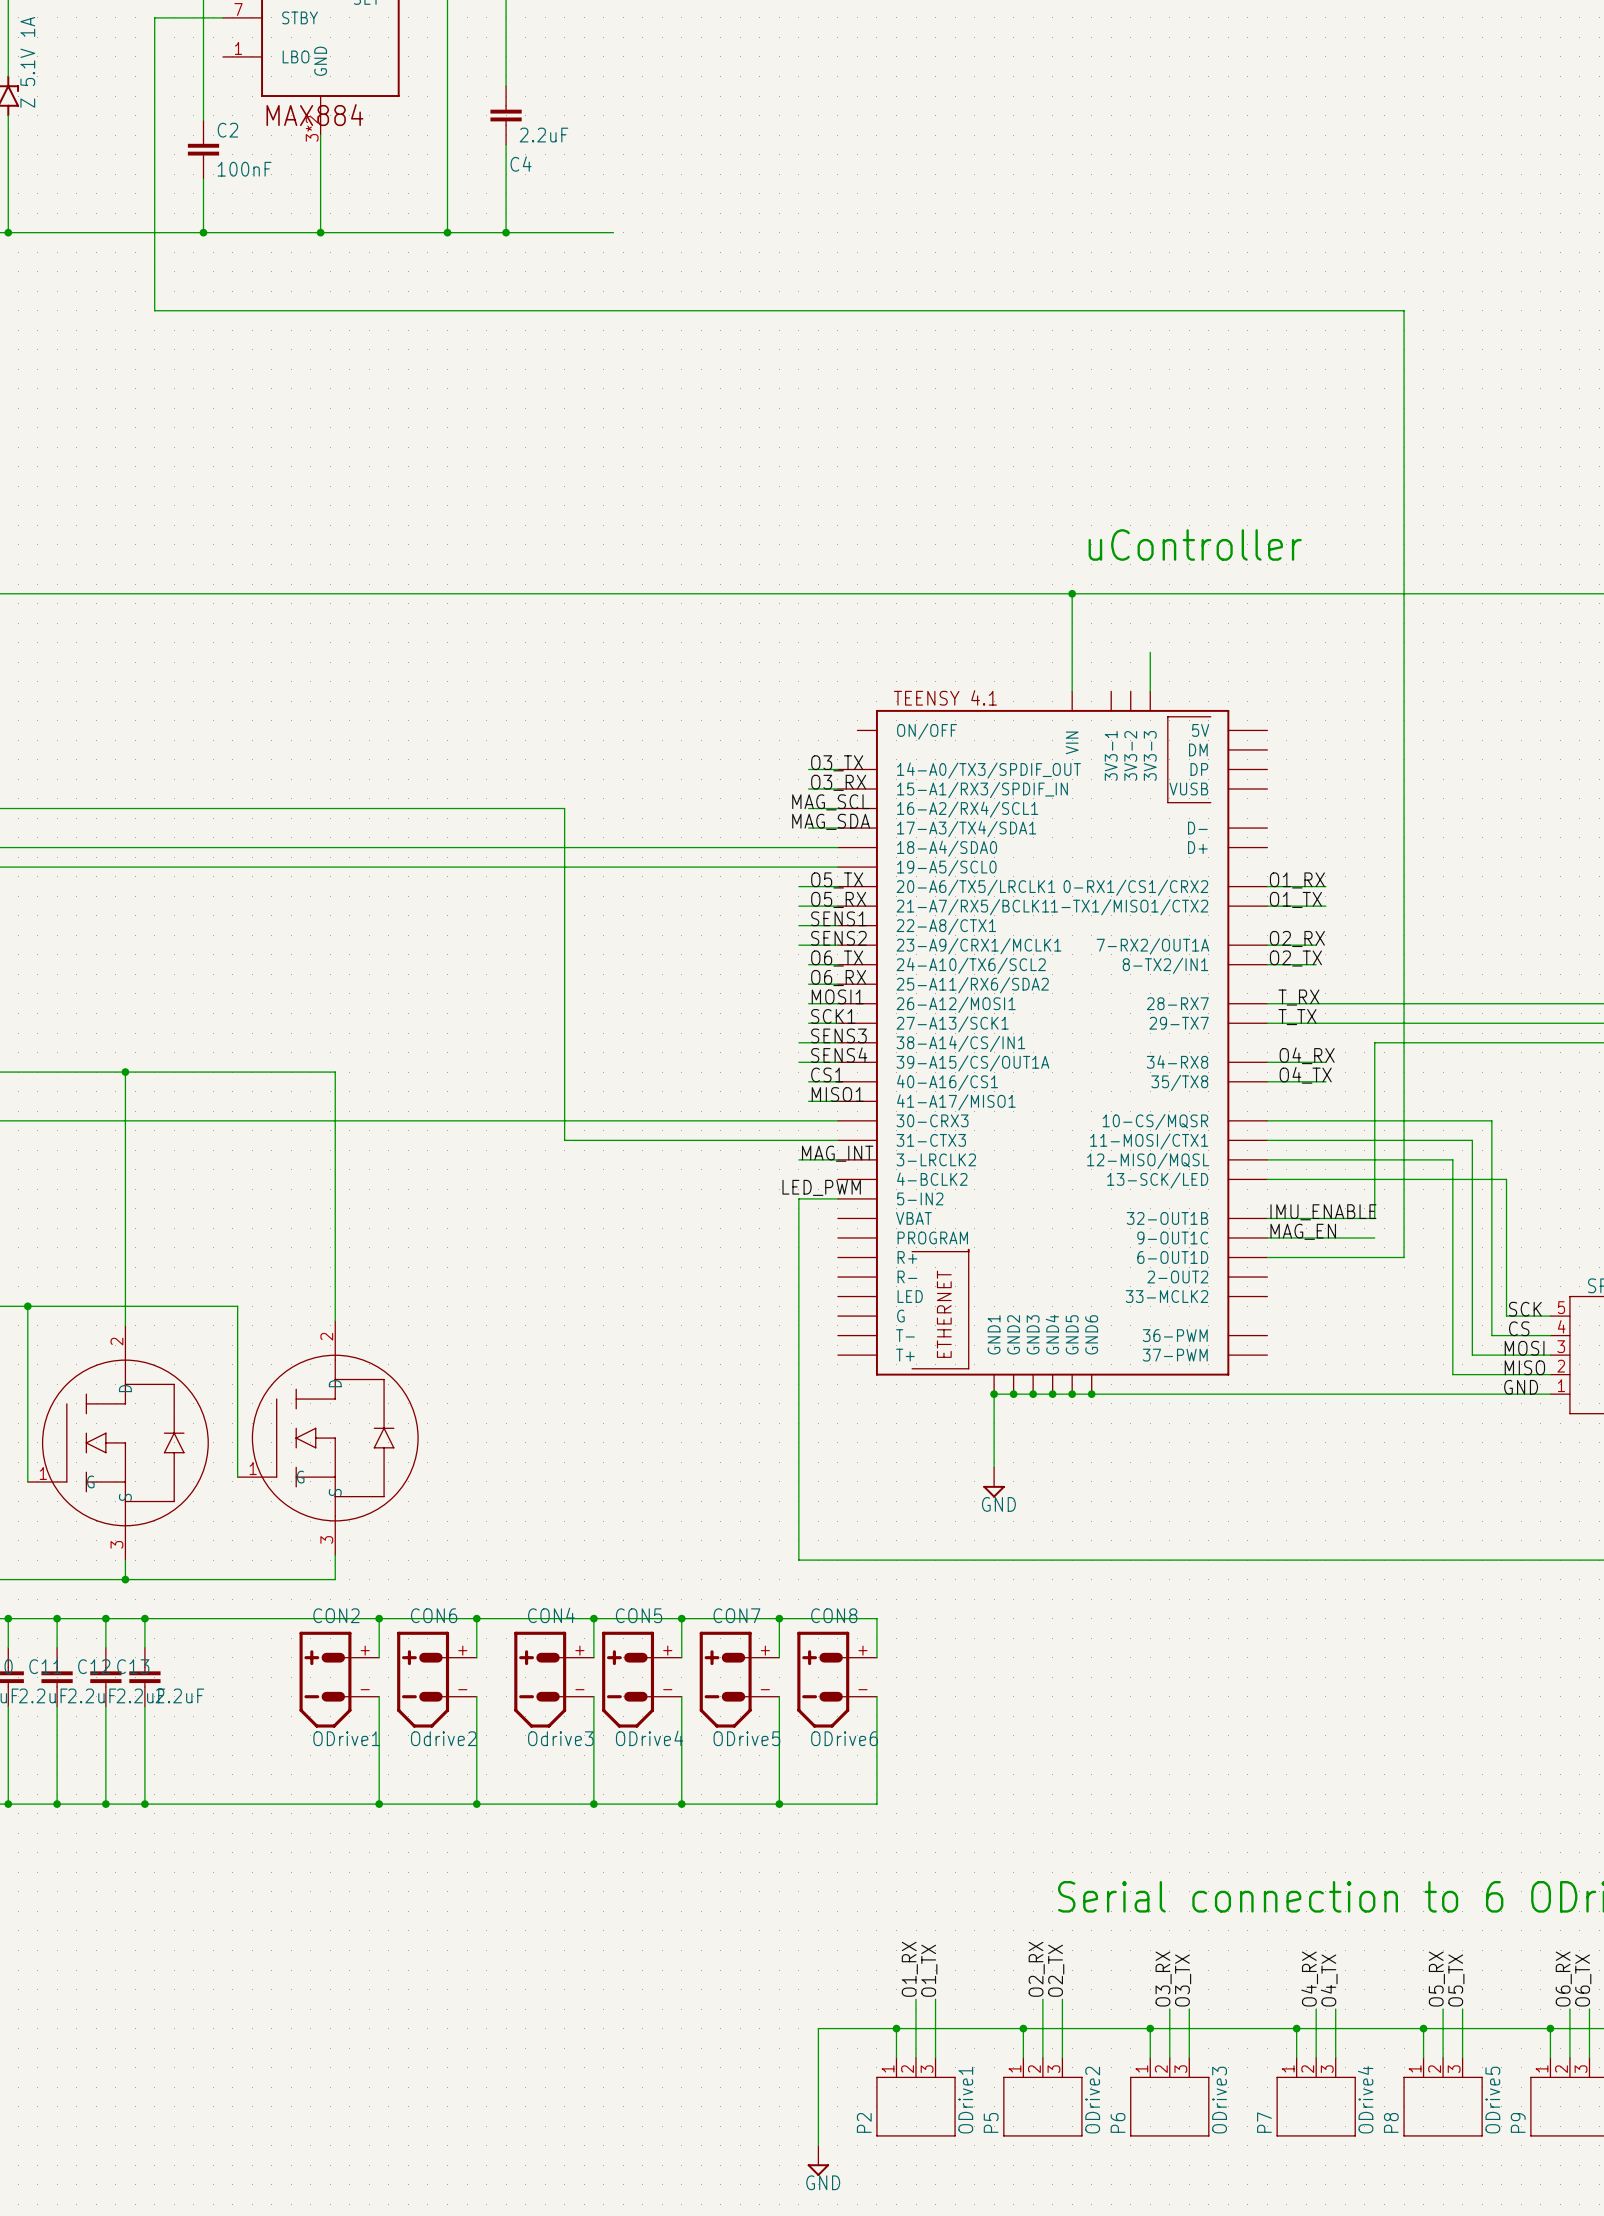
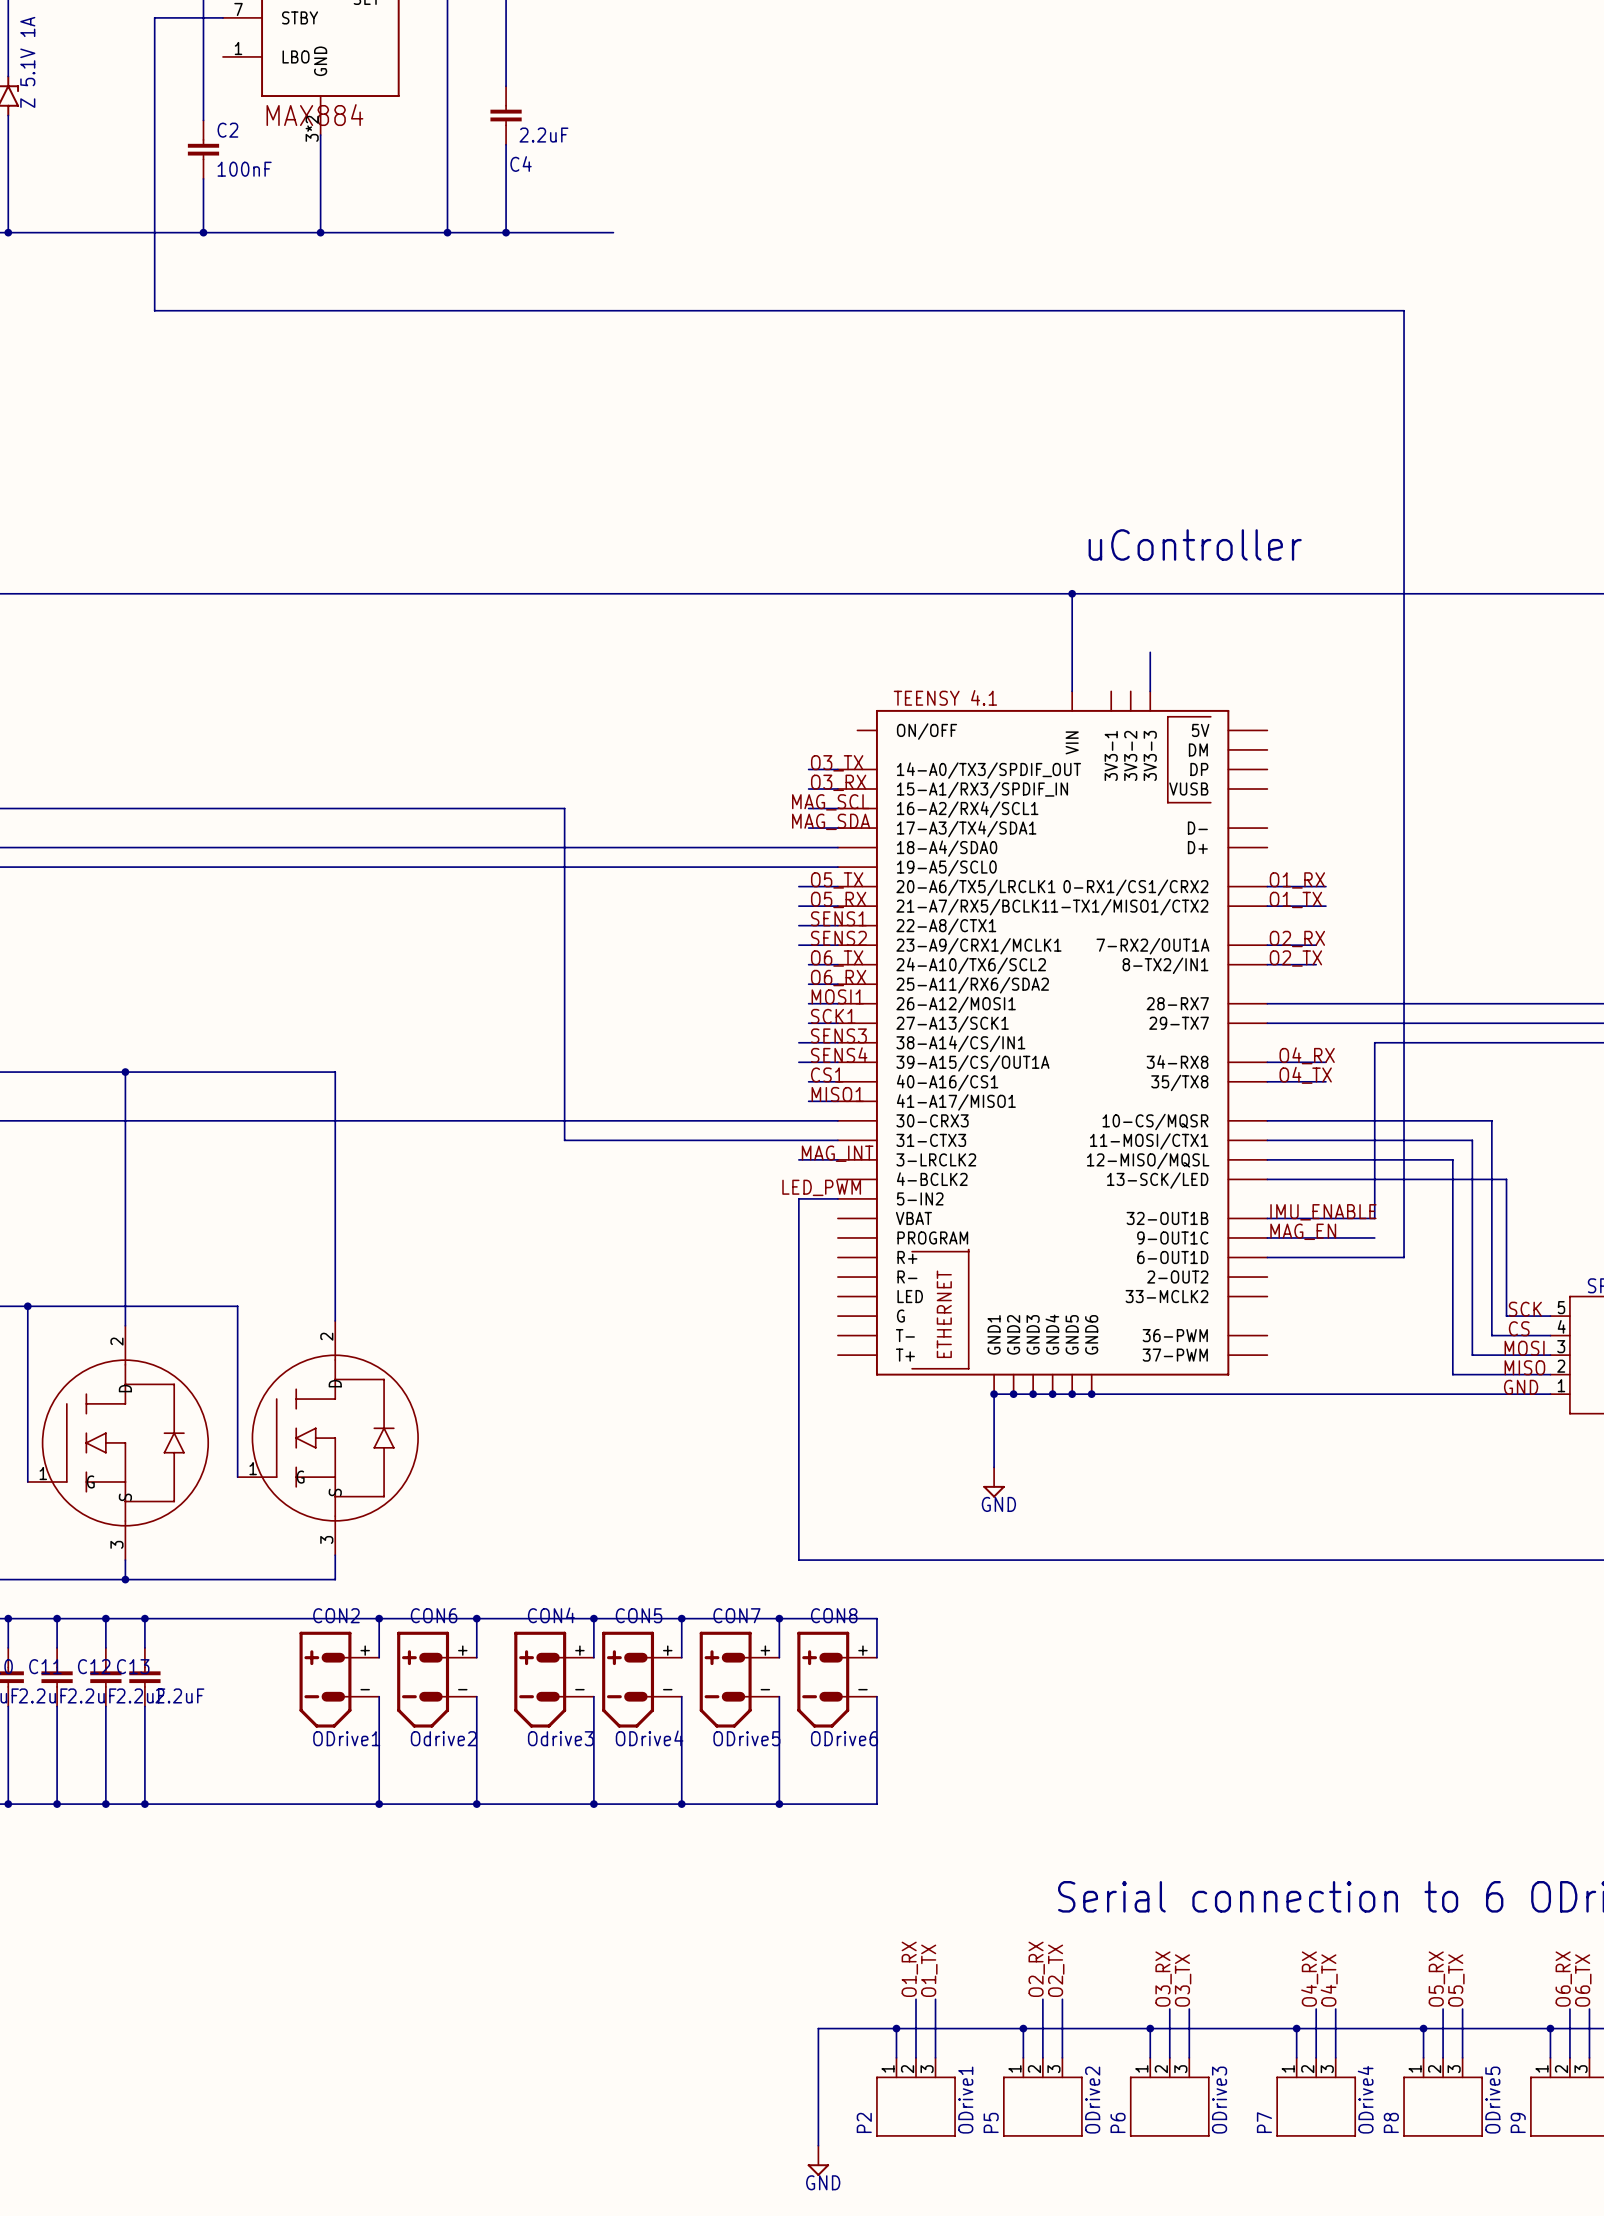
label: T_RX (1298, 997) -> none
label: T_TX (1297, 1017) -> none

